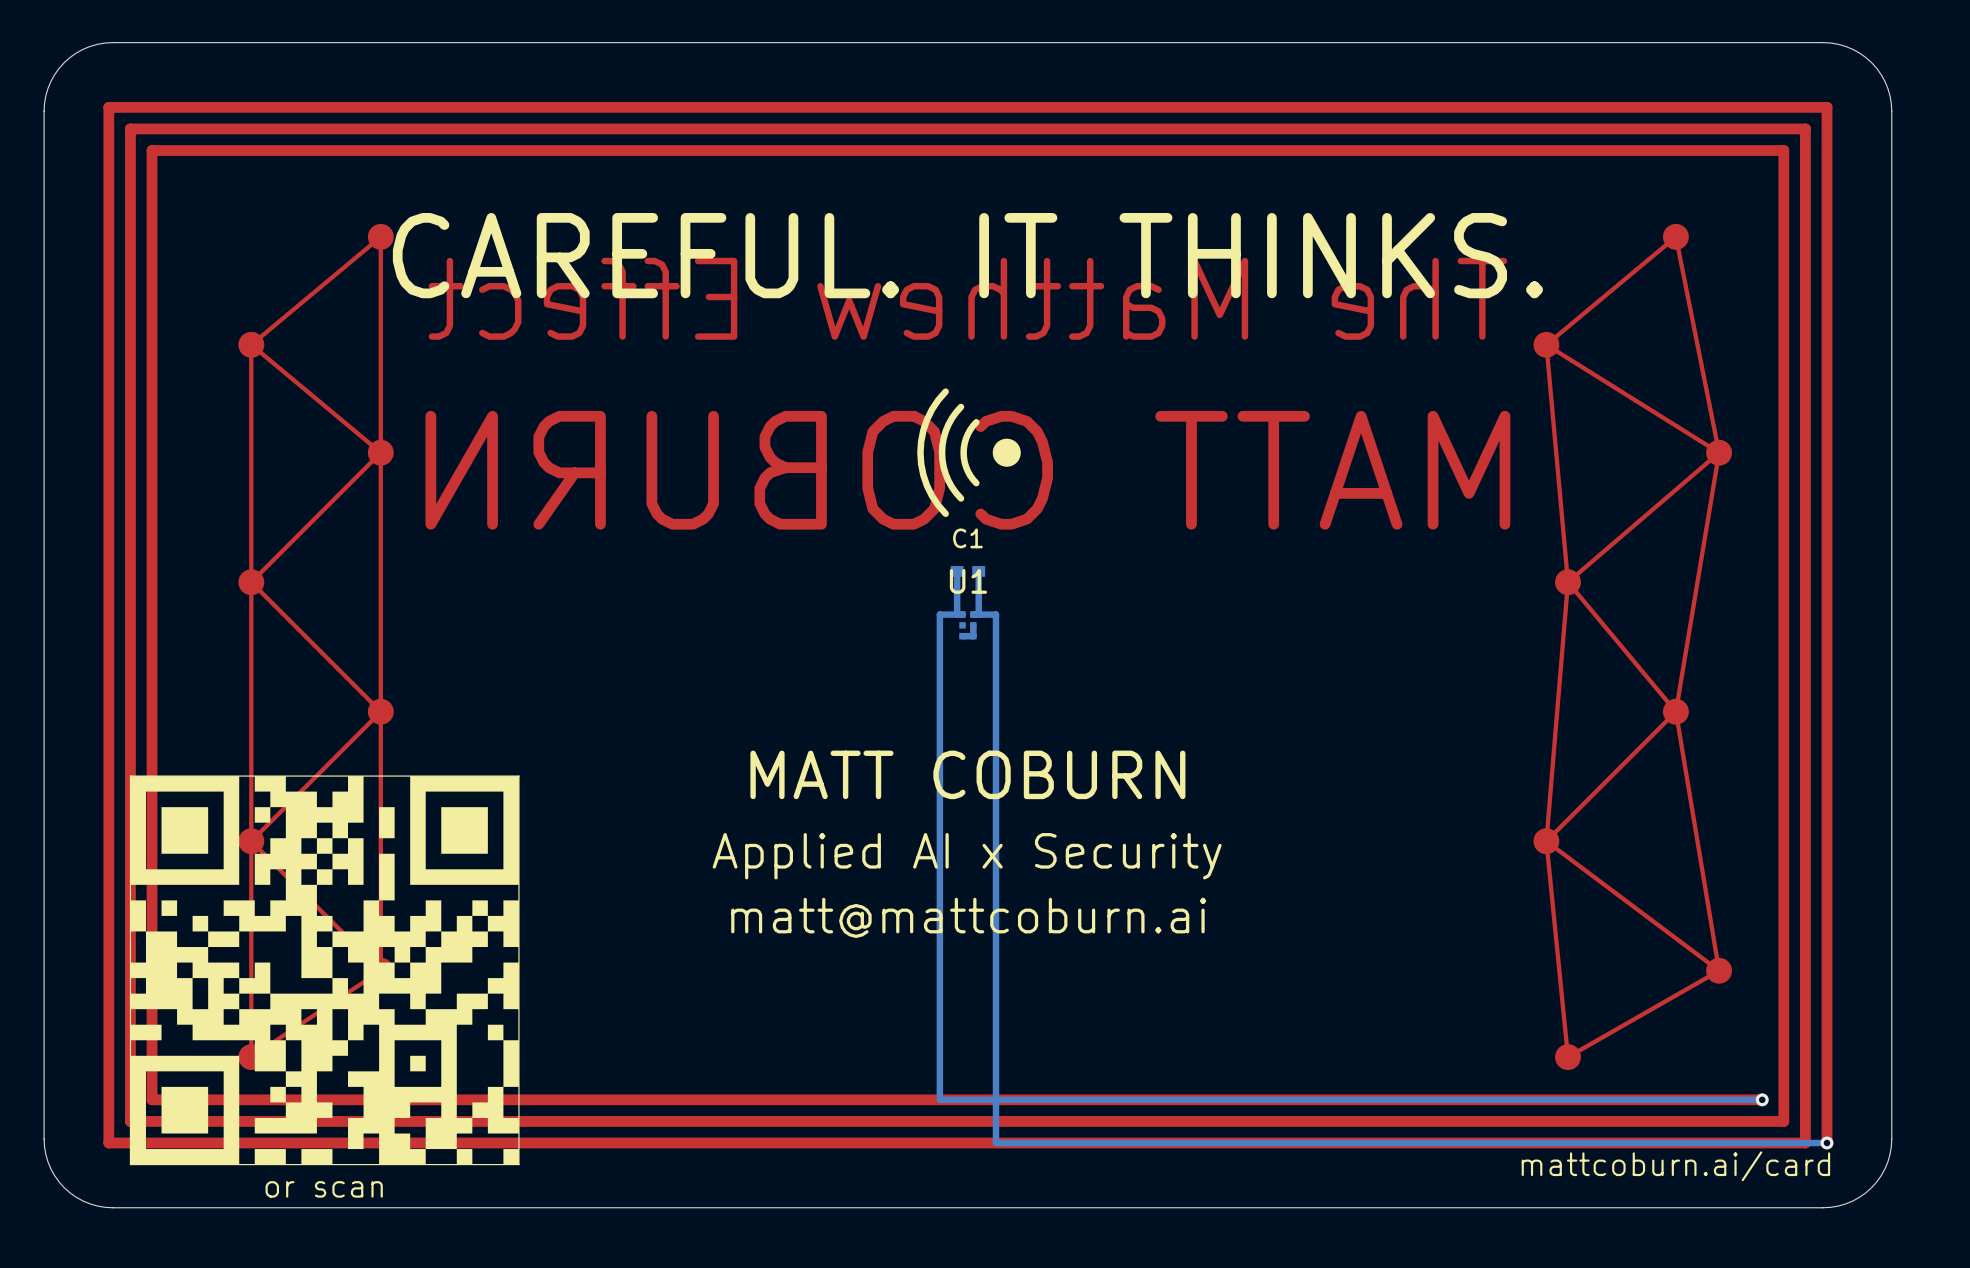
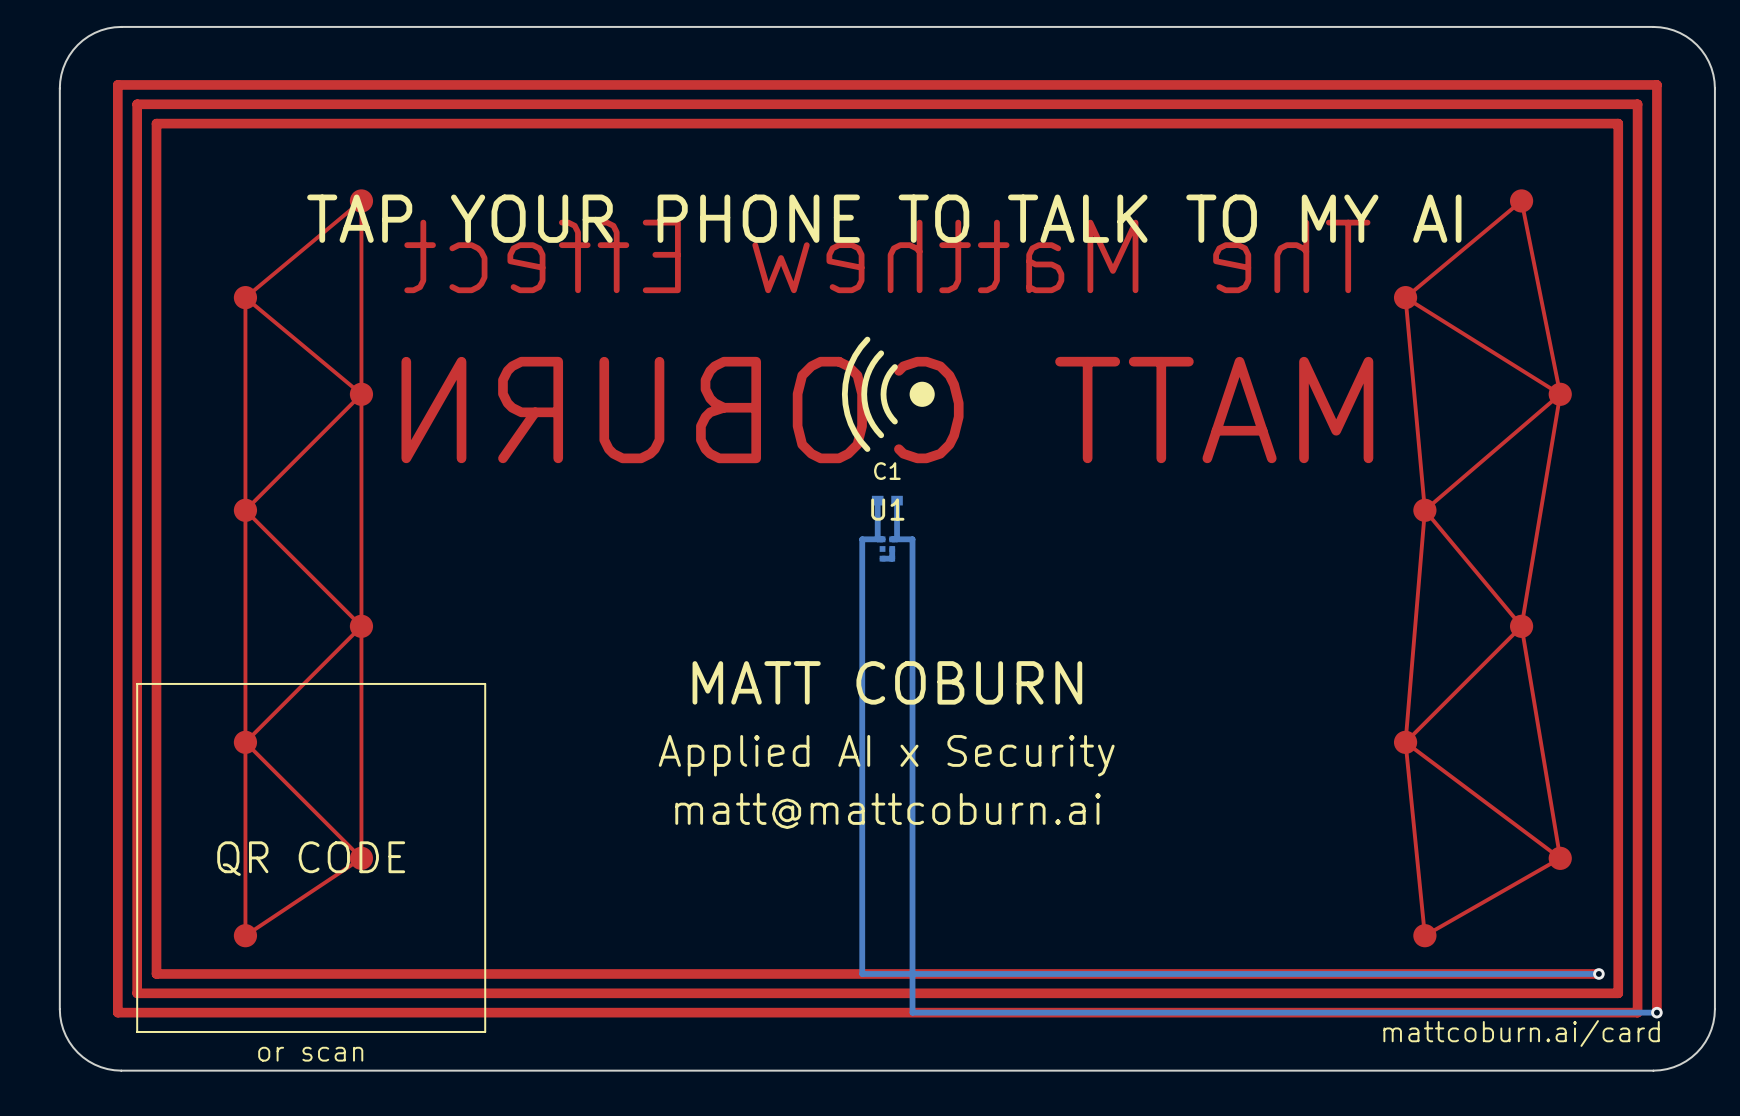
text: CAREFUL. IT THINKS. (967, 255) -> TAP YOUR PHONE TO TALK TO MY AI (884, 218)
drawing: [130, 776, 519, 1165] -> none
text: none -> QR CODE (311, 858)

